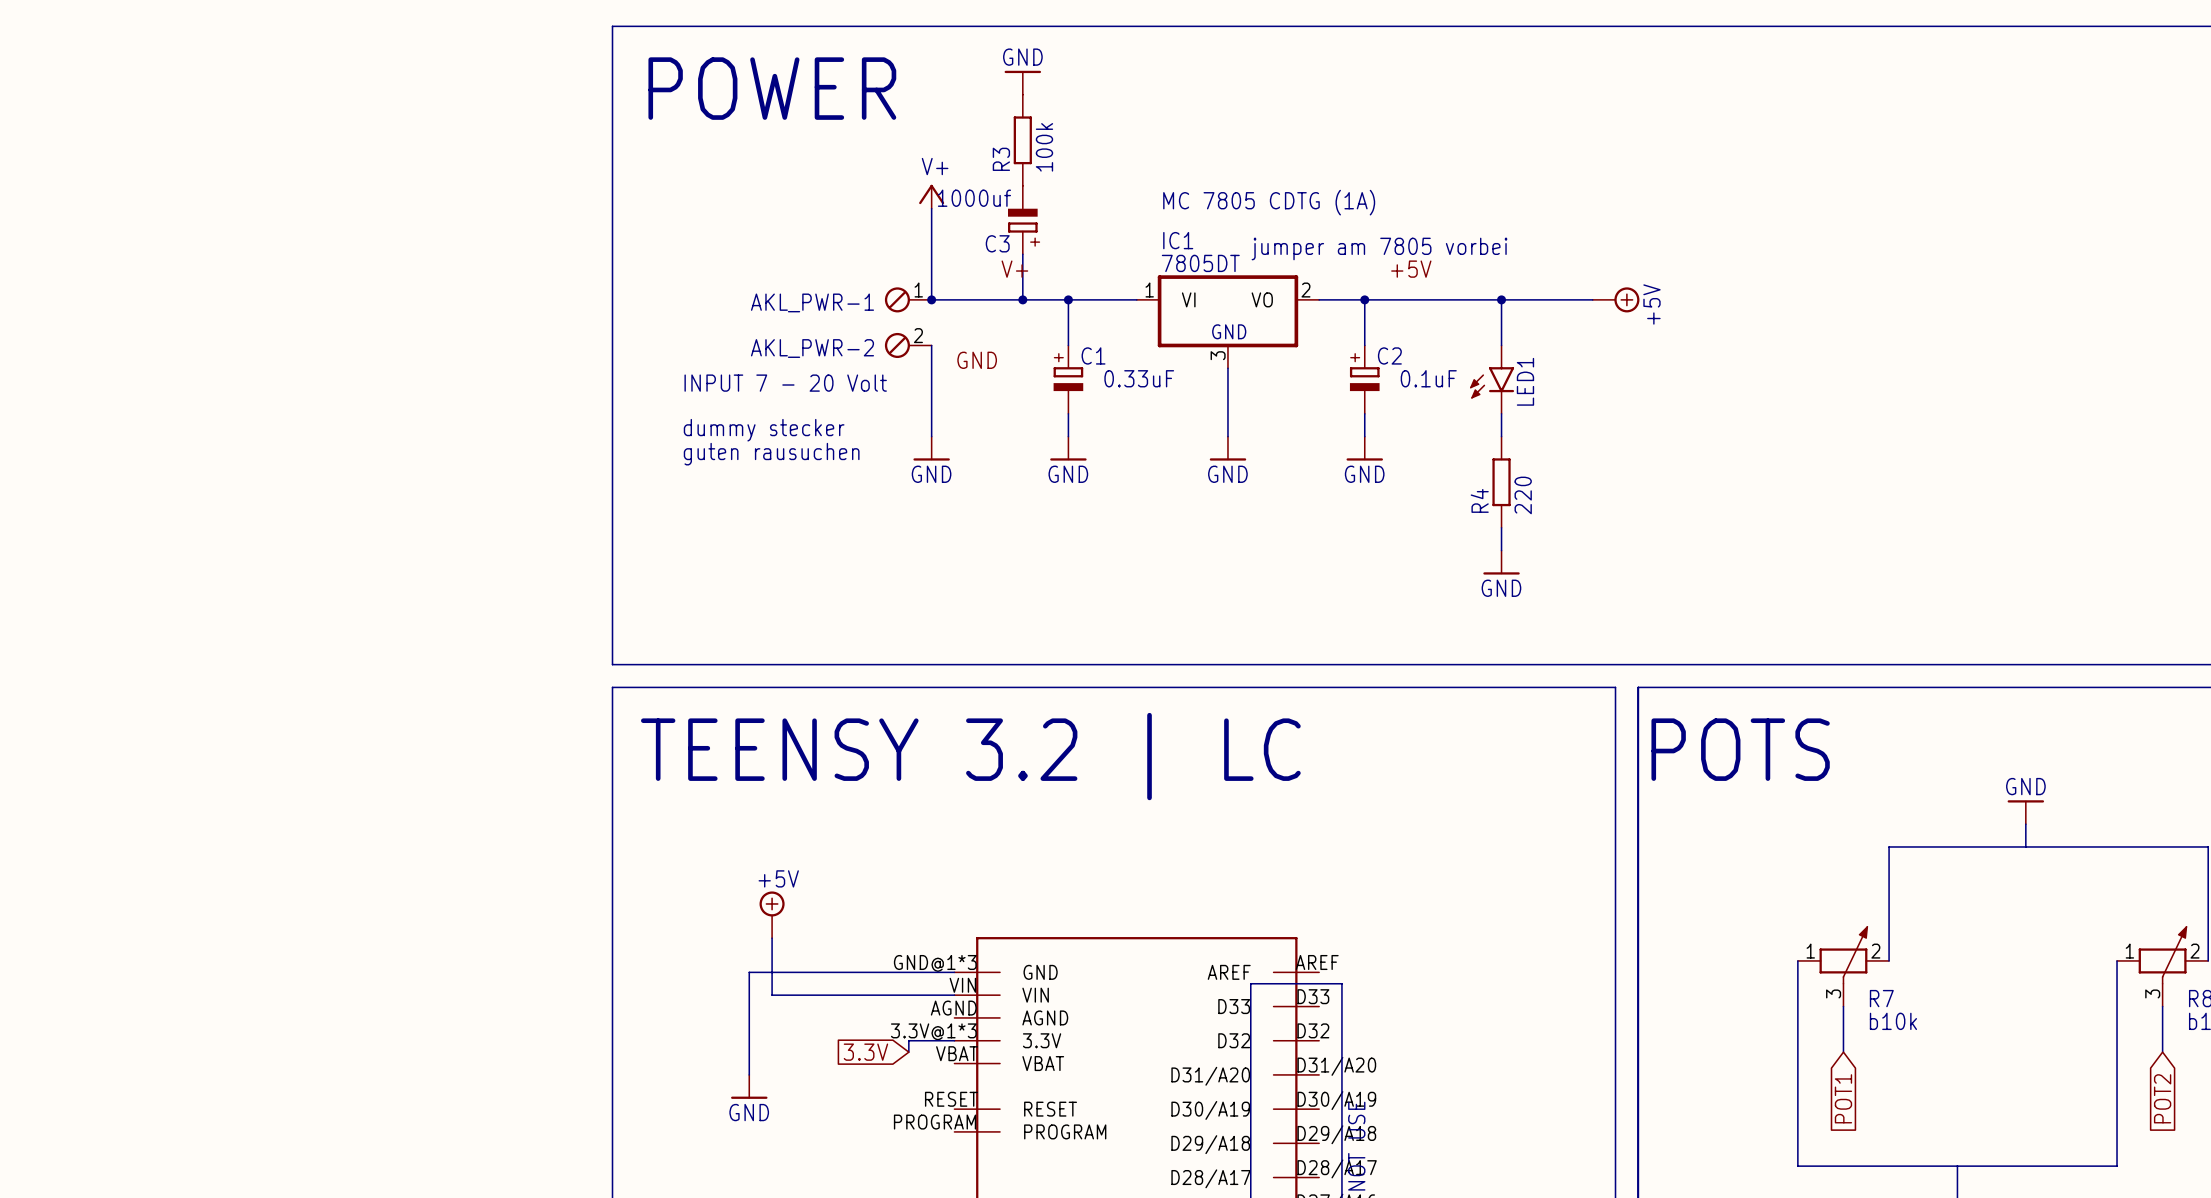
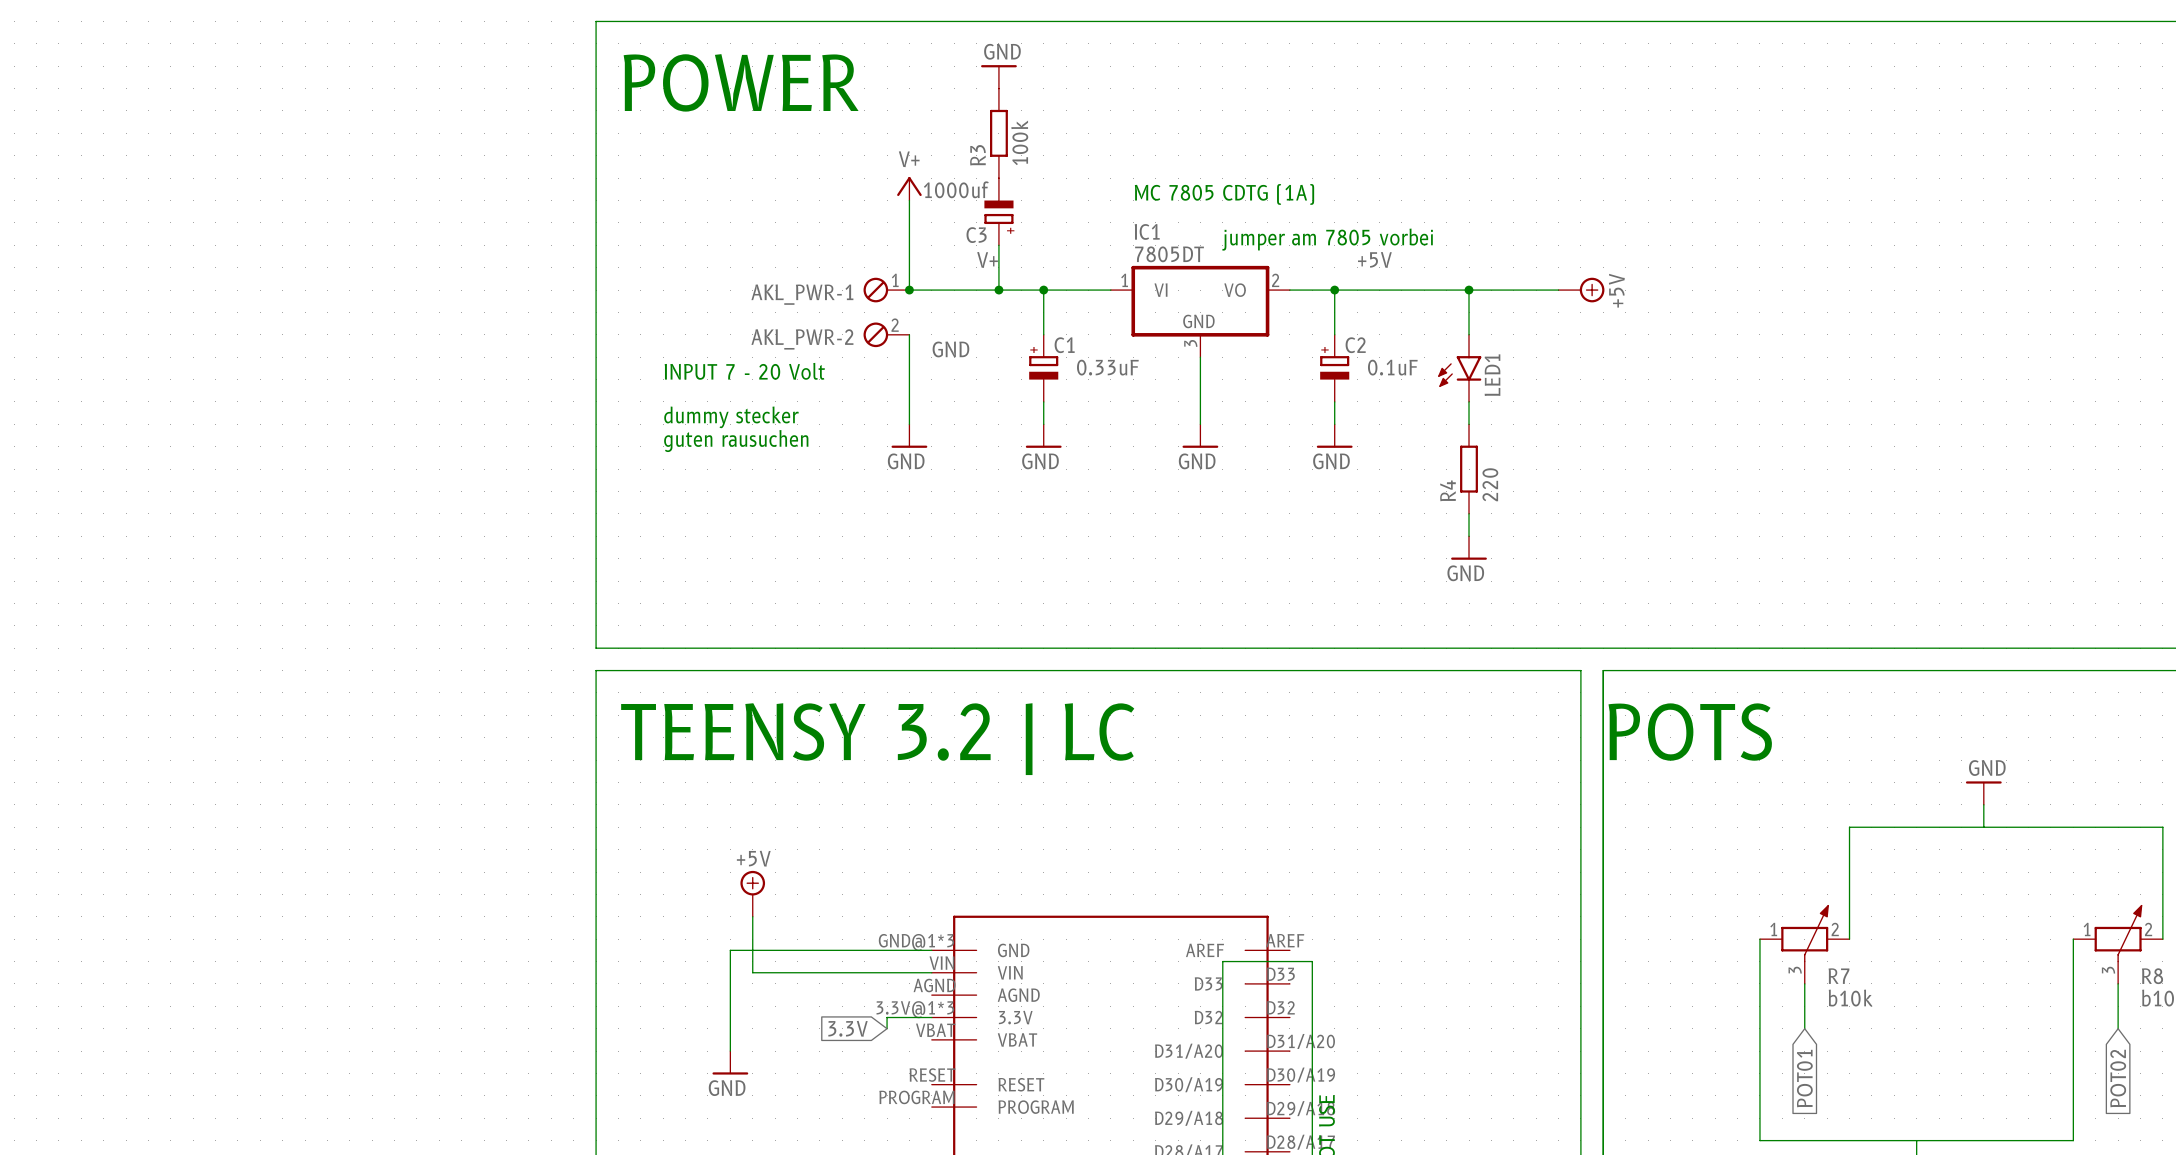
global label: POT1 (1843, 1098) -> POT01 (1804, 1078)
global label: POT2 (2162, 1098) -> POT02 (2118, 1078)

